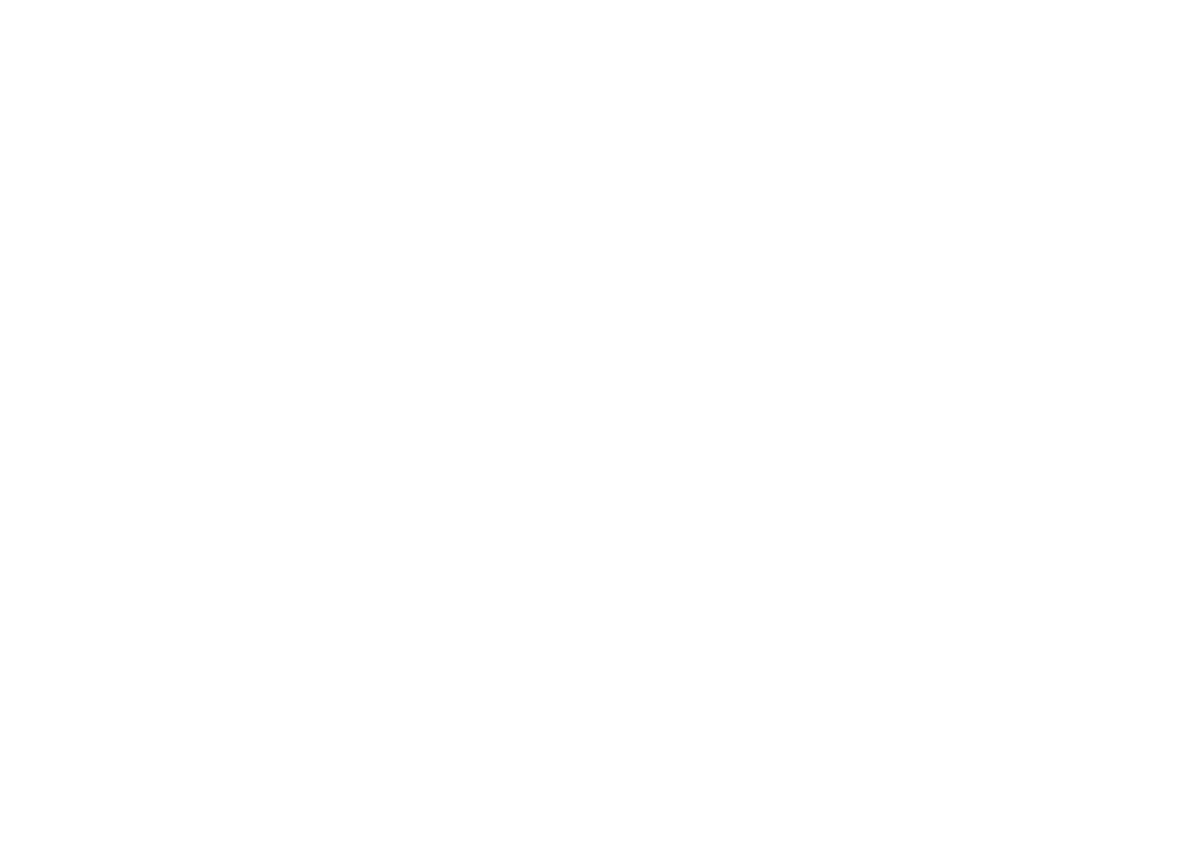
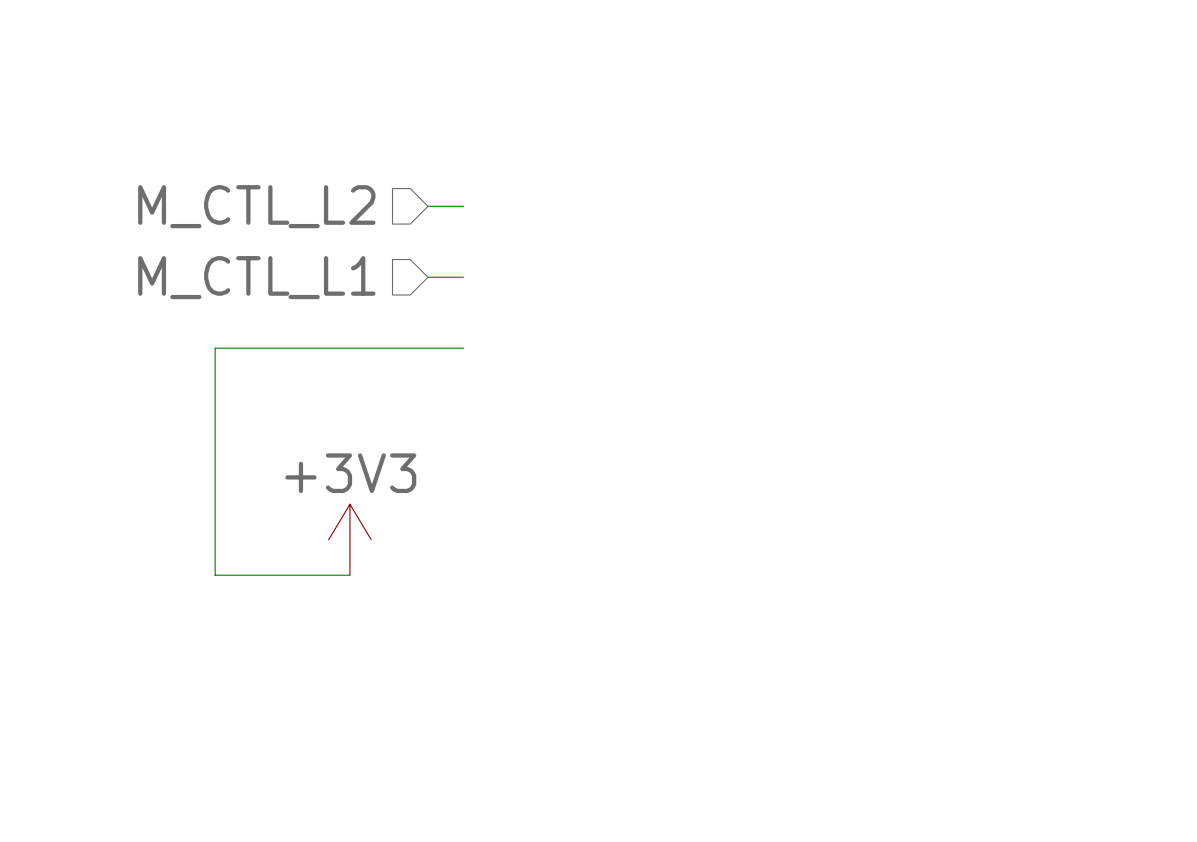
hierarchical label: none -> M_CTL_L2 (256, 206)
wire: none -> (427, 206) (463, 206)
hierarchical label: none -> M_CTL_L1 (256, 277)
wire: none -> (427, 277) (463, 277)
wire: none -> (463, 348) (215, 348) (215, 575) (349, 575)
power symbol: none -> +3V3 (349, 539)

